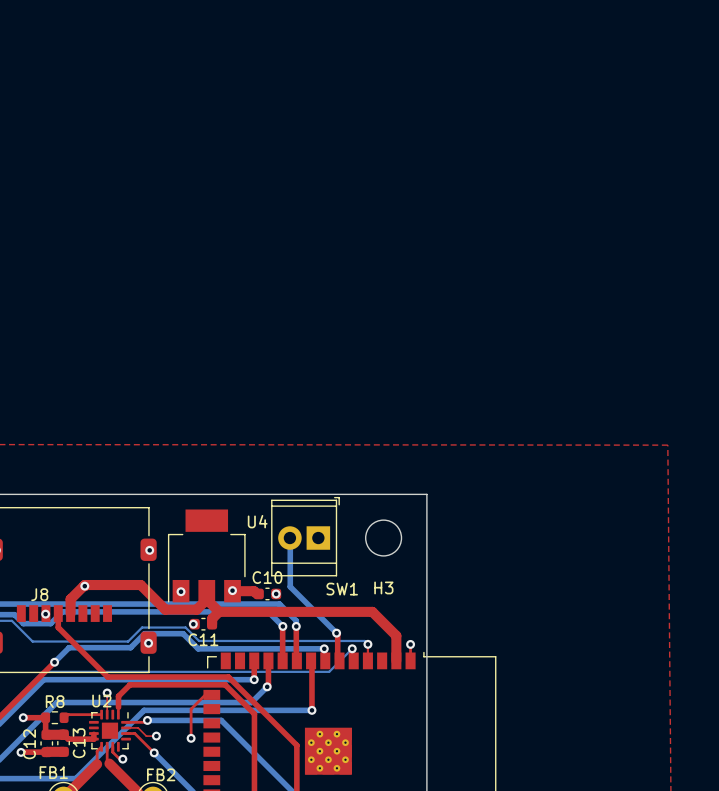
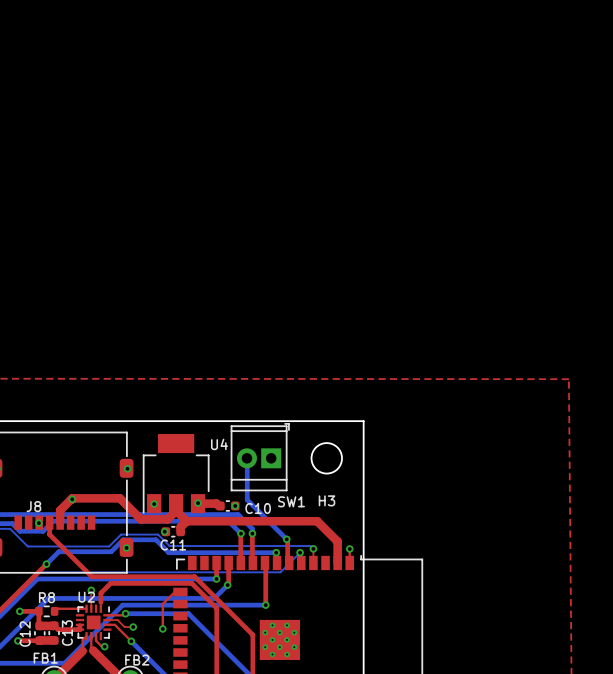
C10 name position: C10 (267, 577) -> C10 (258, 508)

